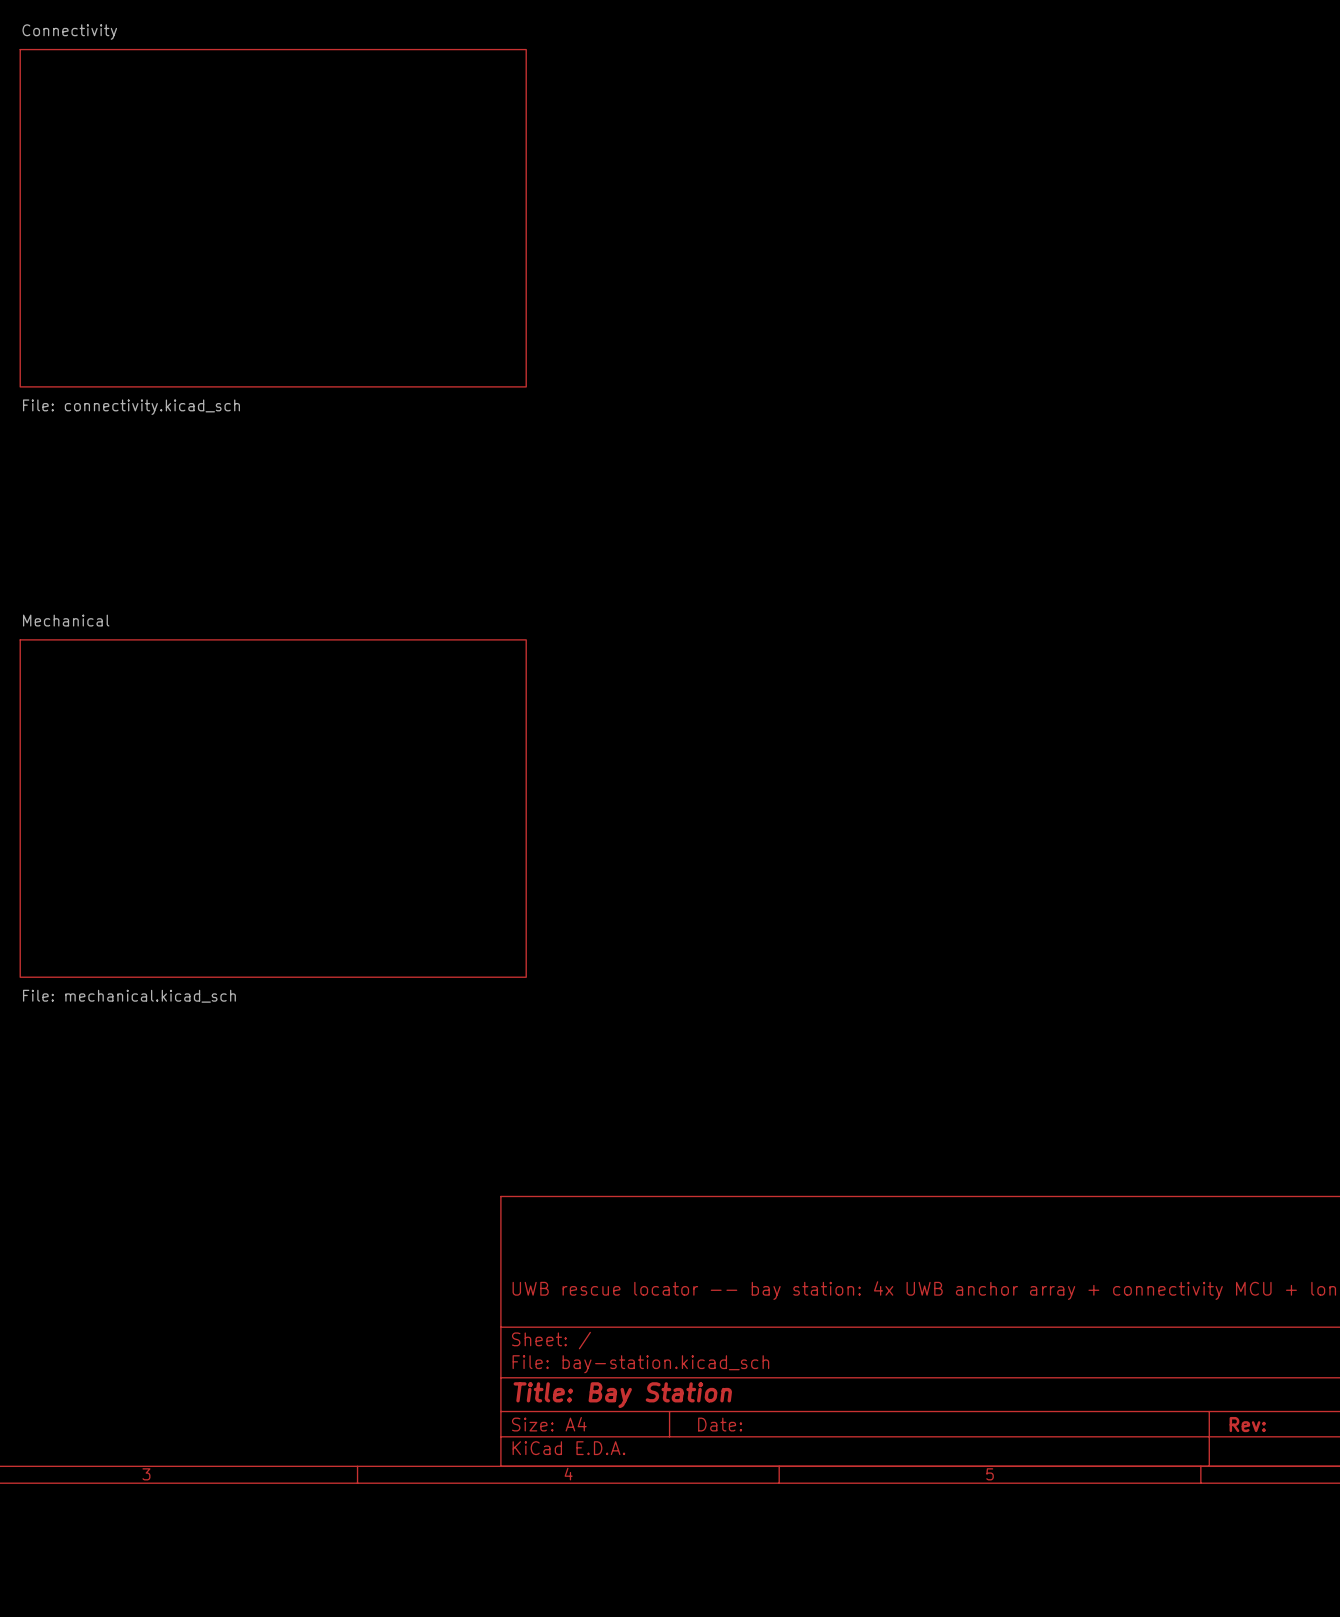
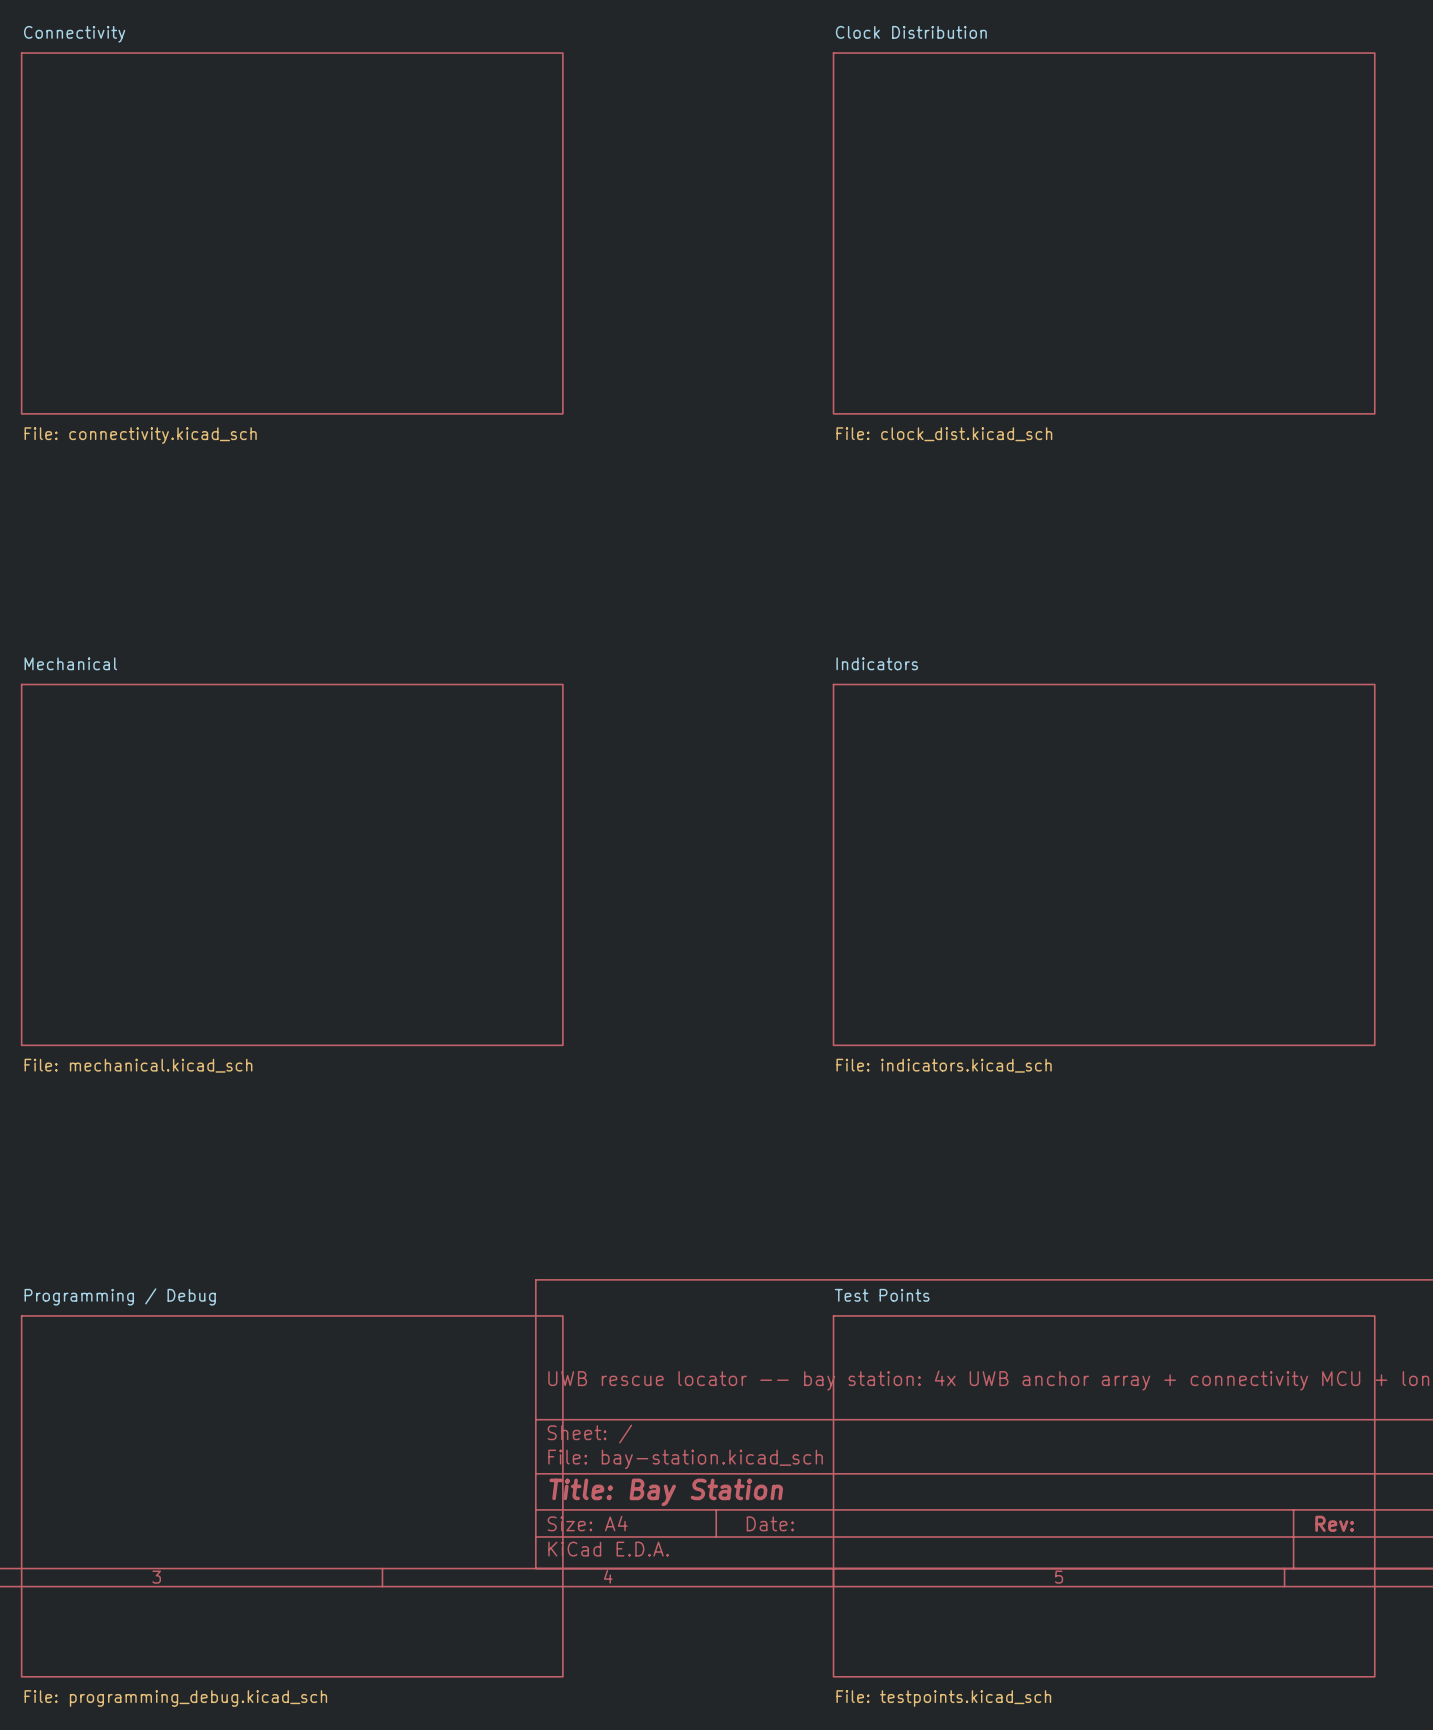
sheet Clock Distribution: none -> File: clock_dist.kicad_sch (1104, 233)
sheet Indicators: none -> File: indicators.kicad_sch (1104, 864)
sheet Programming / Debug: none -> File: programming_debug.kicad_sch (292, 1496)
sheet Test Points: none -> File: testpoints.kicad_sch (1104, 1496)

